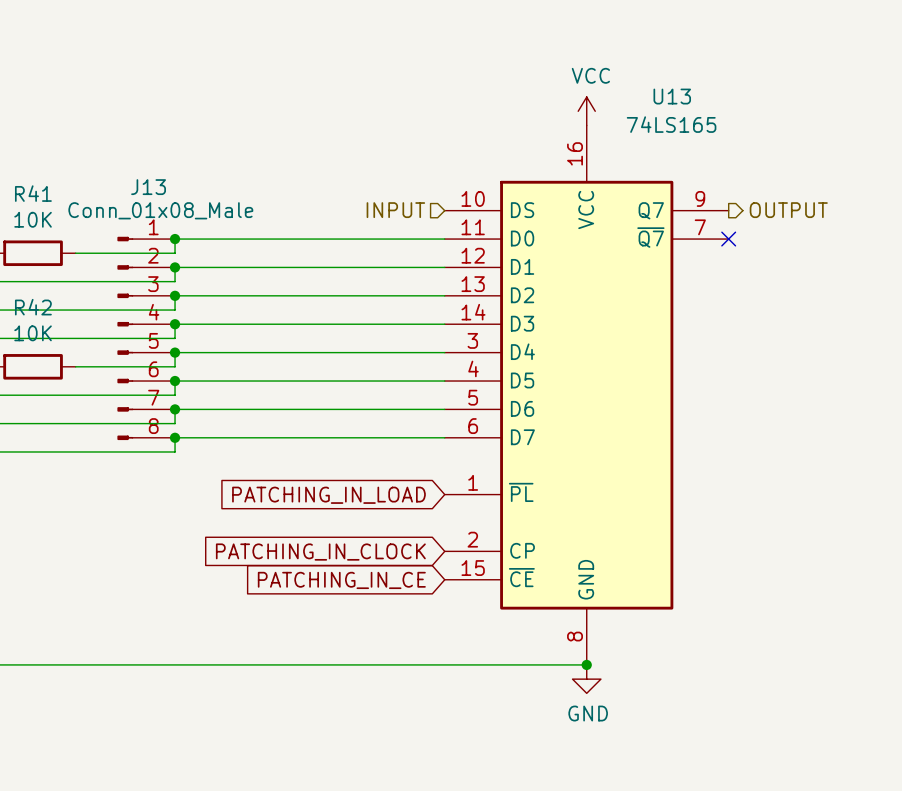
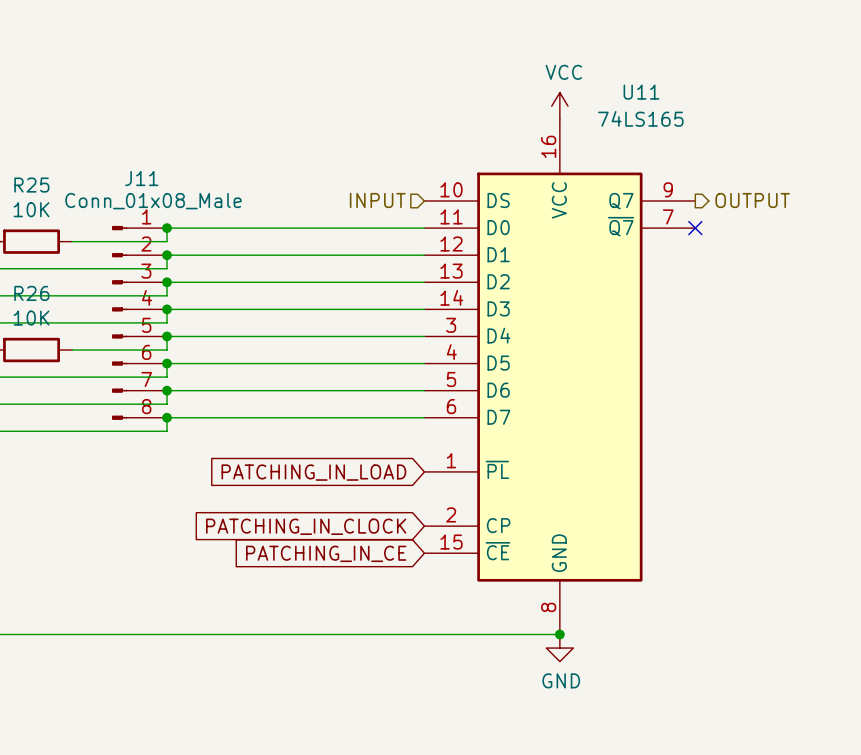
U13 name: U13 (672, 96) -> U11 (641, 92)
J13 name: J13 (148, 187) -> J11 (141, 178)
R41 name: R41 (33, 193) -> R25 (31, 185)
R42 name: R42 (33, 307) -> R26 (31, 293)

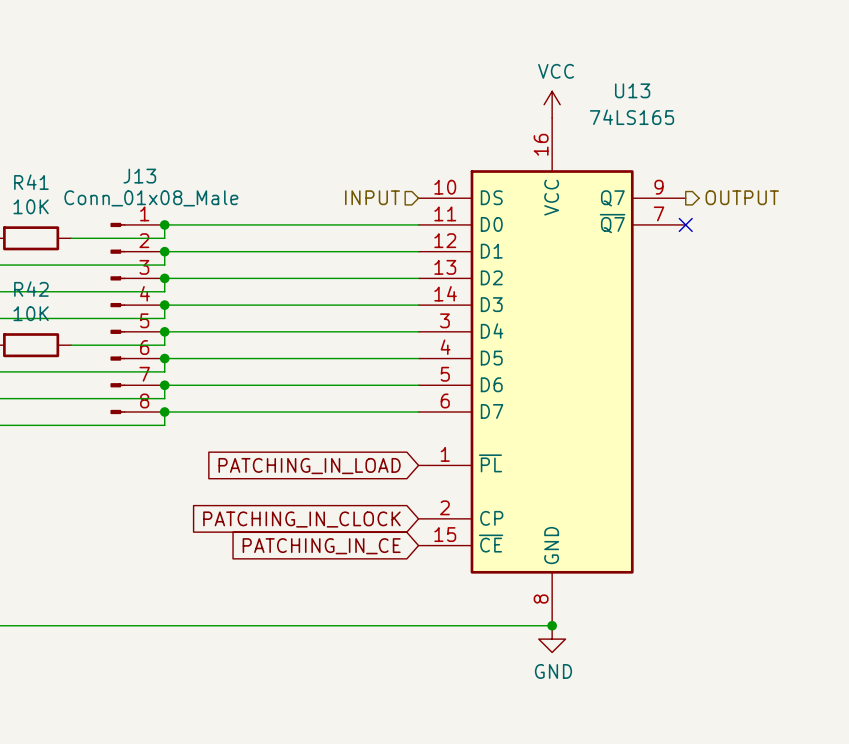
U11 name: U11 (641, 92) -> U13 (632, 90)
J11 name: J11 (141, 178) -> J13 (139, 176)
R25 name: R25 (31, 185) -> R41 (31, 182)
R26 name: R26 (31, 293) -> R42 (31, 289)

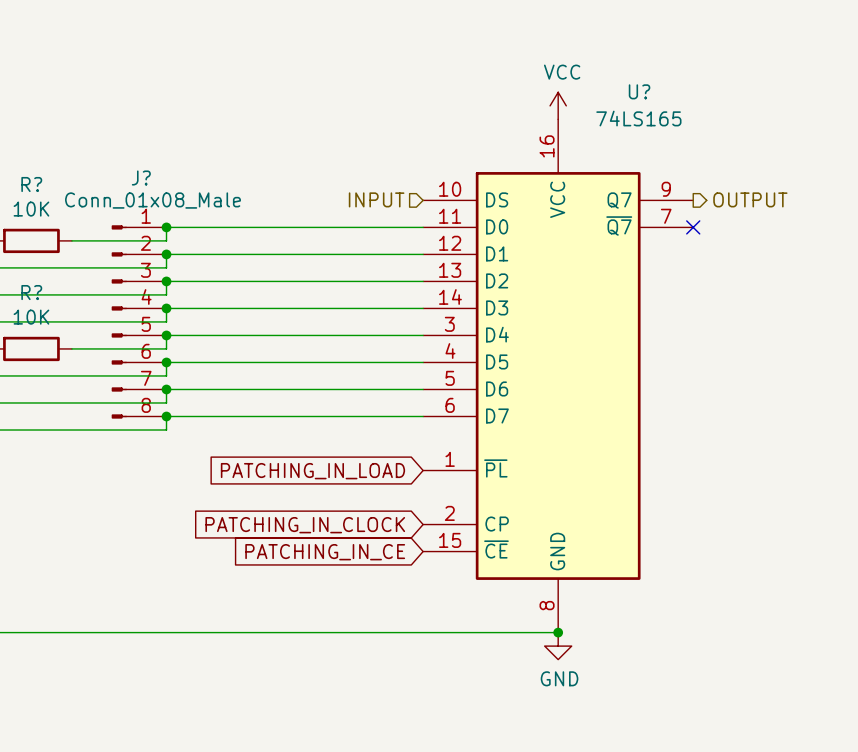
U13 name: U13 (632, 90) -> U? (639, 91)
J13 name: J13 (139, 176) -> J? (141, 178)
R41 name: R41 (31, 182) -> R? (31, 184)
R42 name: R42 (31, 289) -> R? (31, 292)

